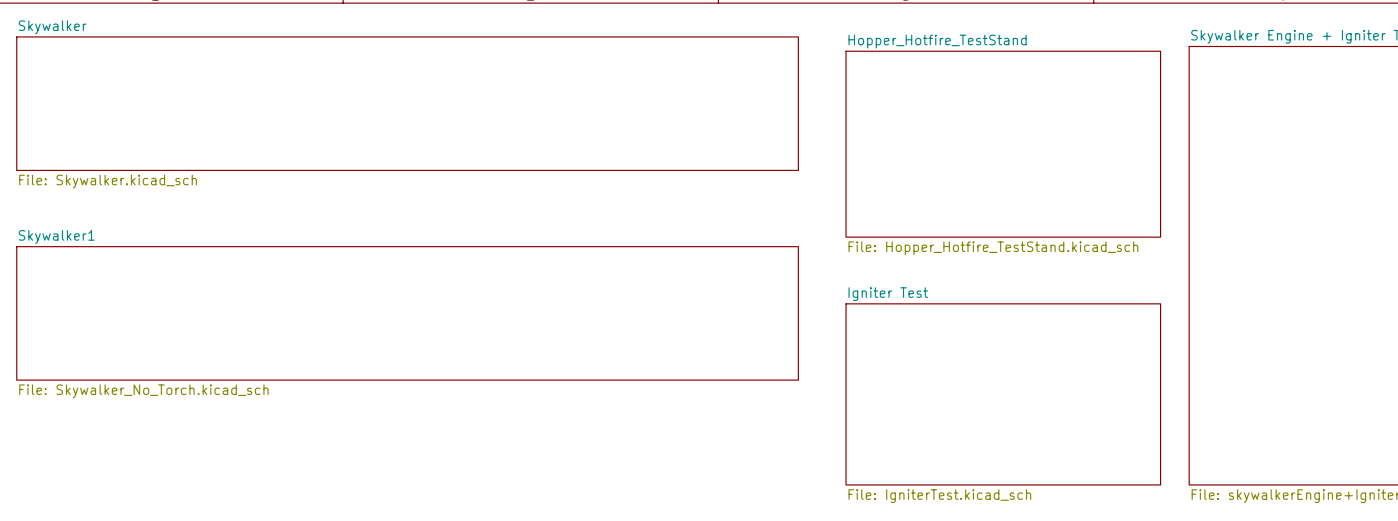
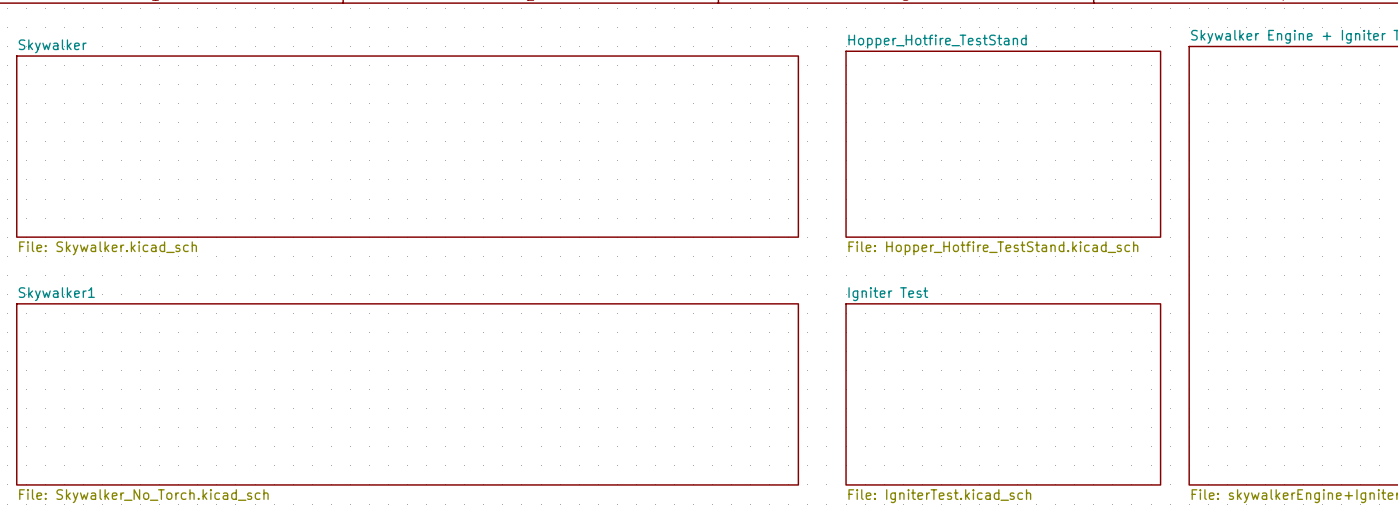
sheet Skywalker: File: Skywalker.kicad_sch (407, 103) -> none
sheet Skywalker: none -> File: Skywalker.kicad_sch (407, 146)
sheet Skywalker1 name position: Skywalker1 (56, 236) -> Skywalker1 (56, 294)
sheet Skywalker1 shape: [16, 246, 799, 381] -> [16, 303, 799, 486]
sheet Skywalker1 value position: File: Skywalker_No_Torch.kicad_sch (143, 391) -> File: Skywalker_No_Torch.kicad_sch (143, 496)

